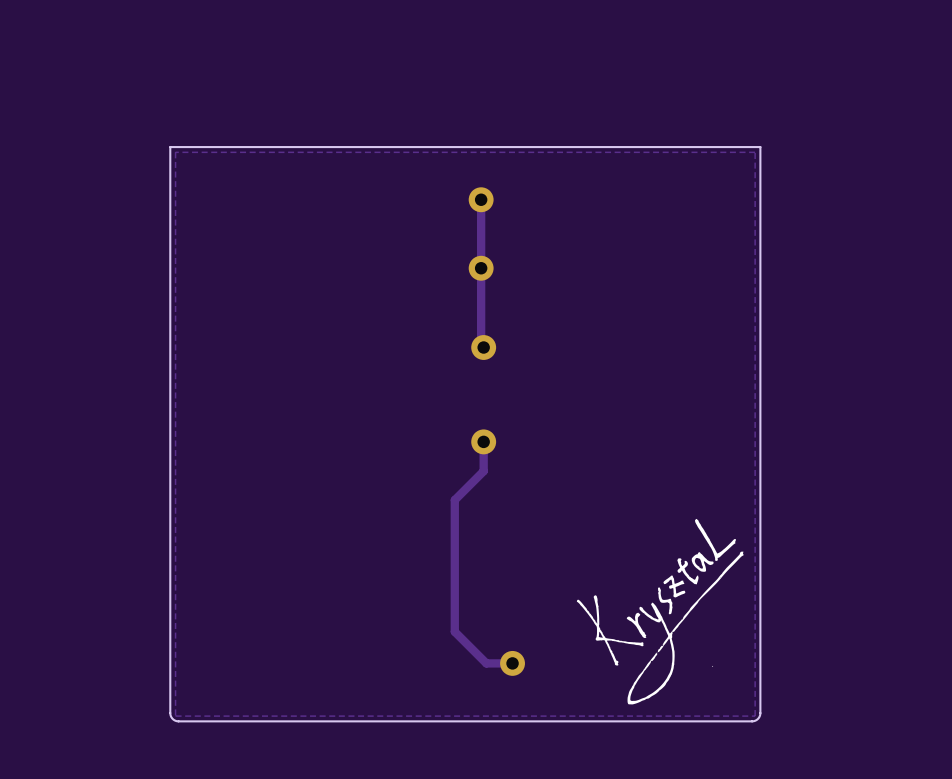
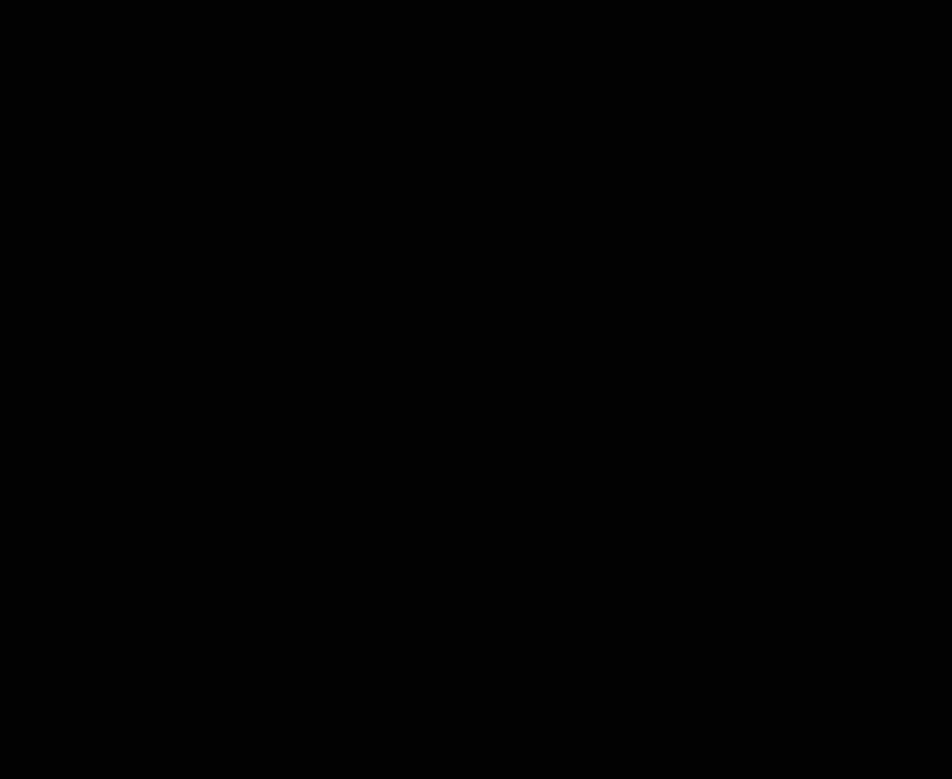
board edge: (760, 147) (760, 713) (757, 718) (752, 721) (178, 721) (172, 718) (170, 713) (170, 147) (760, 147) -> none
zone outline: (755, 152) (175, 152) (175, 716) (755, 716) (755, 152) -> none
track: (478, 199) (481, 199) (481, 344) (483, 347) -> none
via: (481, 199) -> none
via: (481, 268) -> none
via: (483, 347) -> none
track: (483, 441) (483, 471) (454, 500) (454, 631) (486, 663) (512, 663) -> none
via: (483, 441) -> none
drawing: [576, 518, 744, 705] -> none
via: (512, 663) -> none

